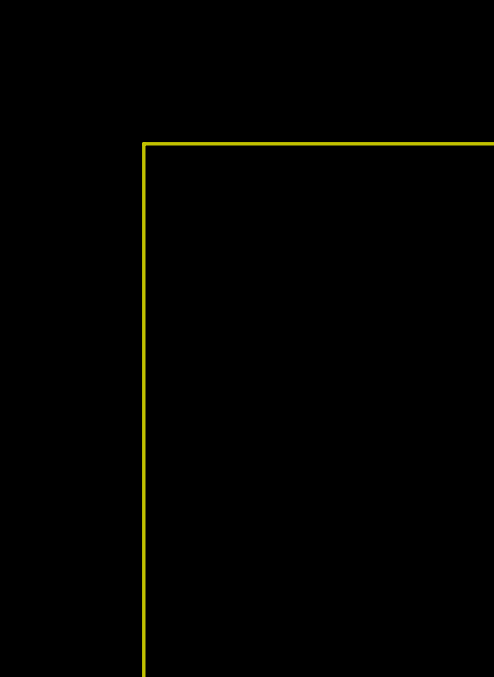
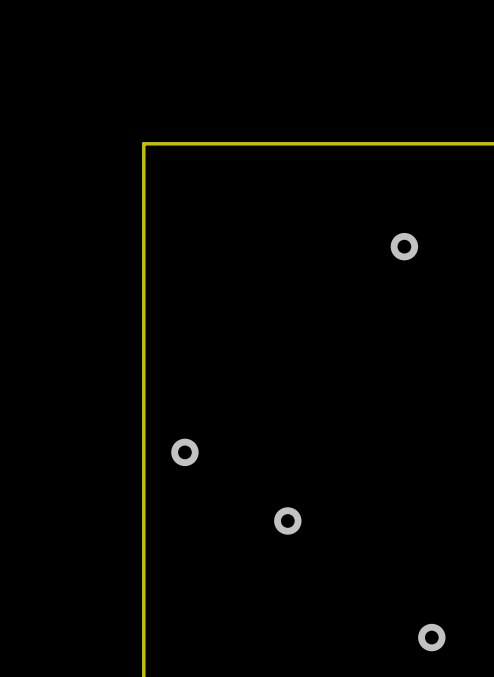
via: none -> (404, 246)
via: none -> (184, 452)
via: none -> (287, 520)
via: none -> (431, 637)

